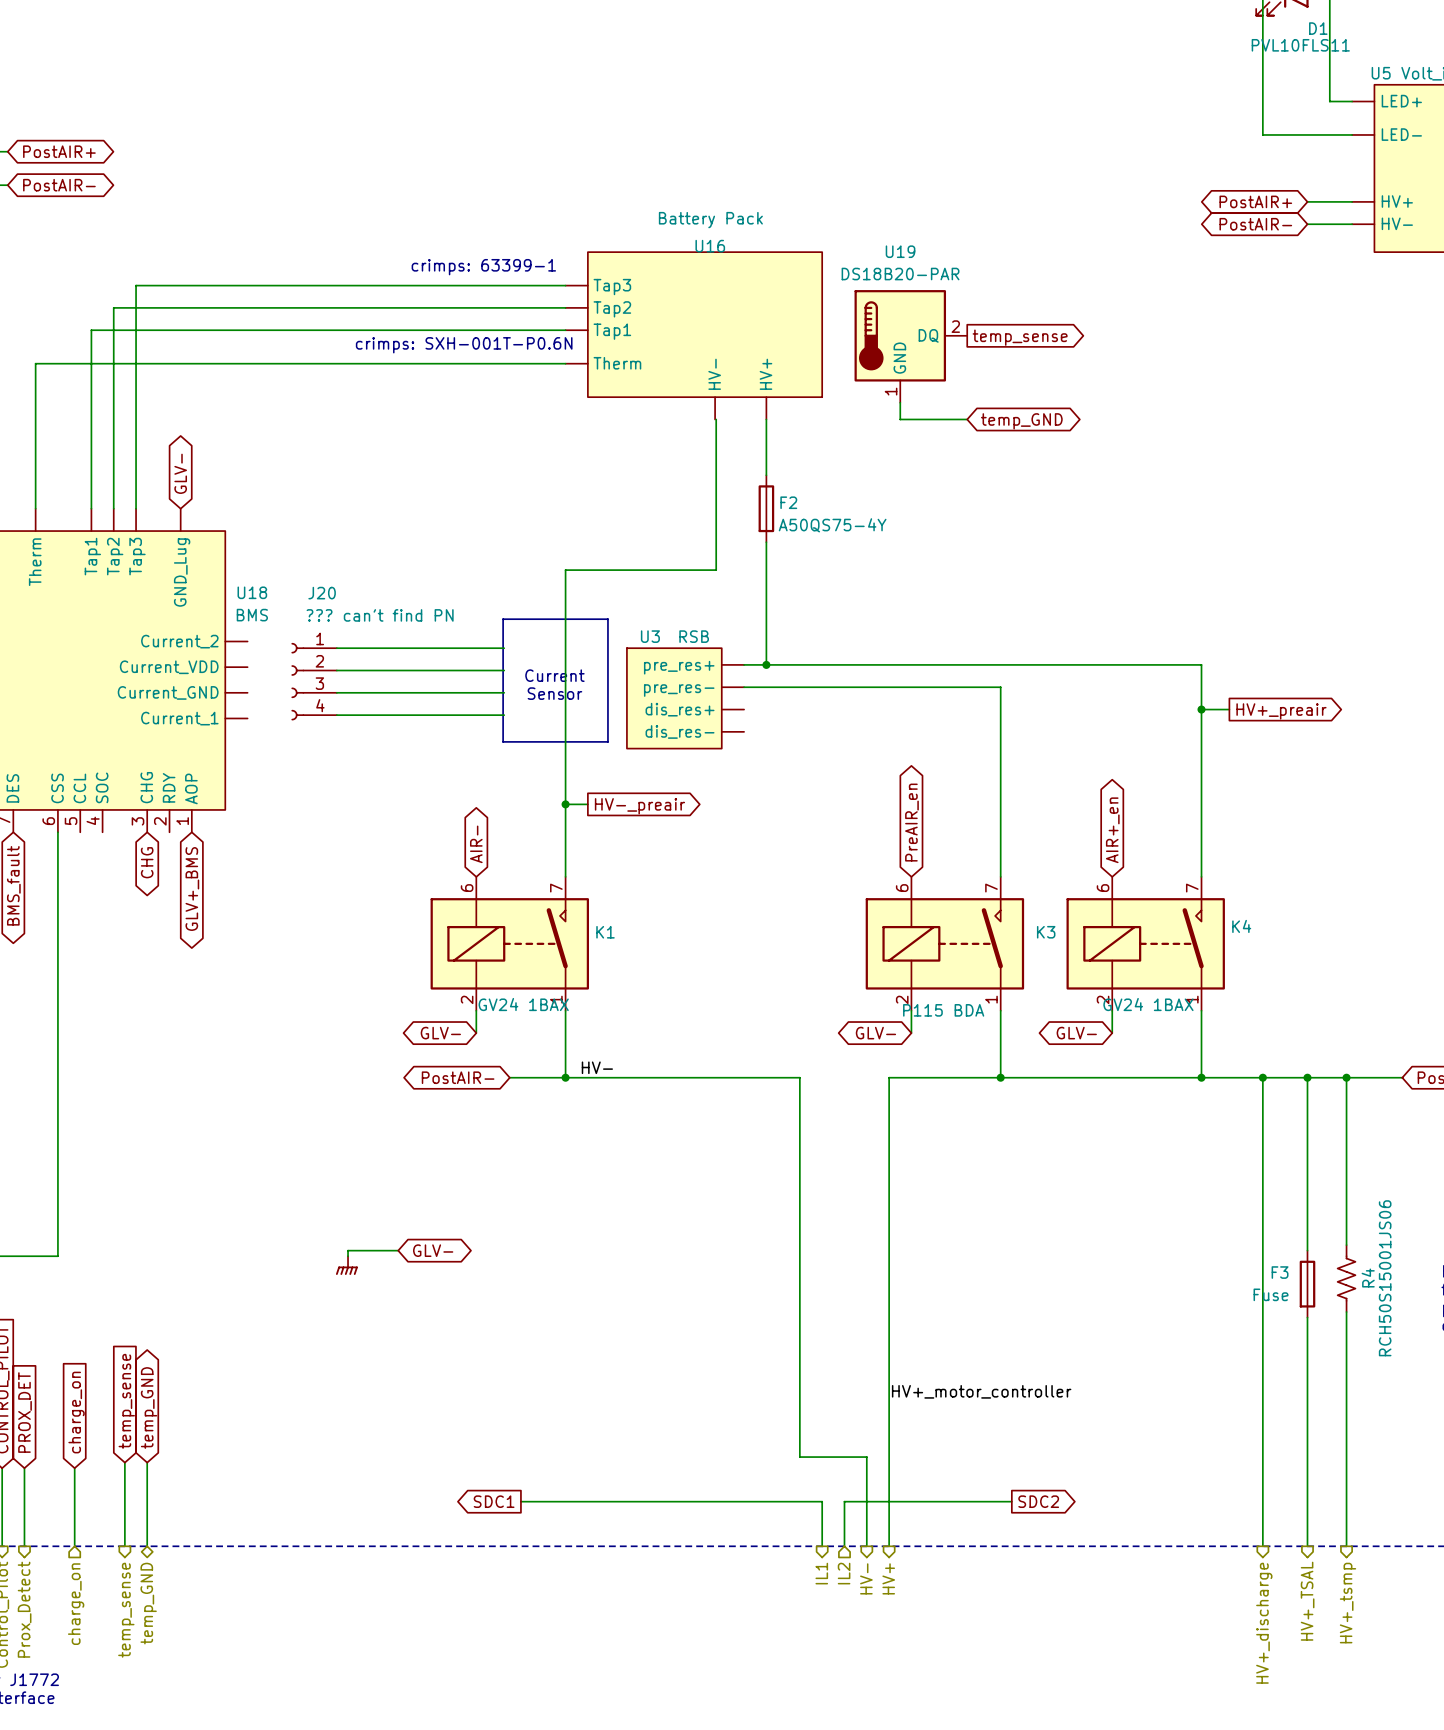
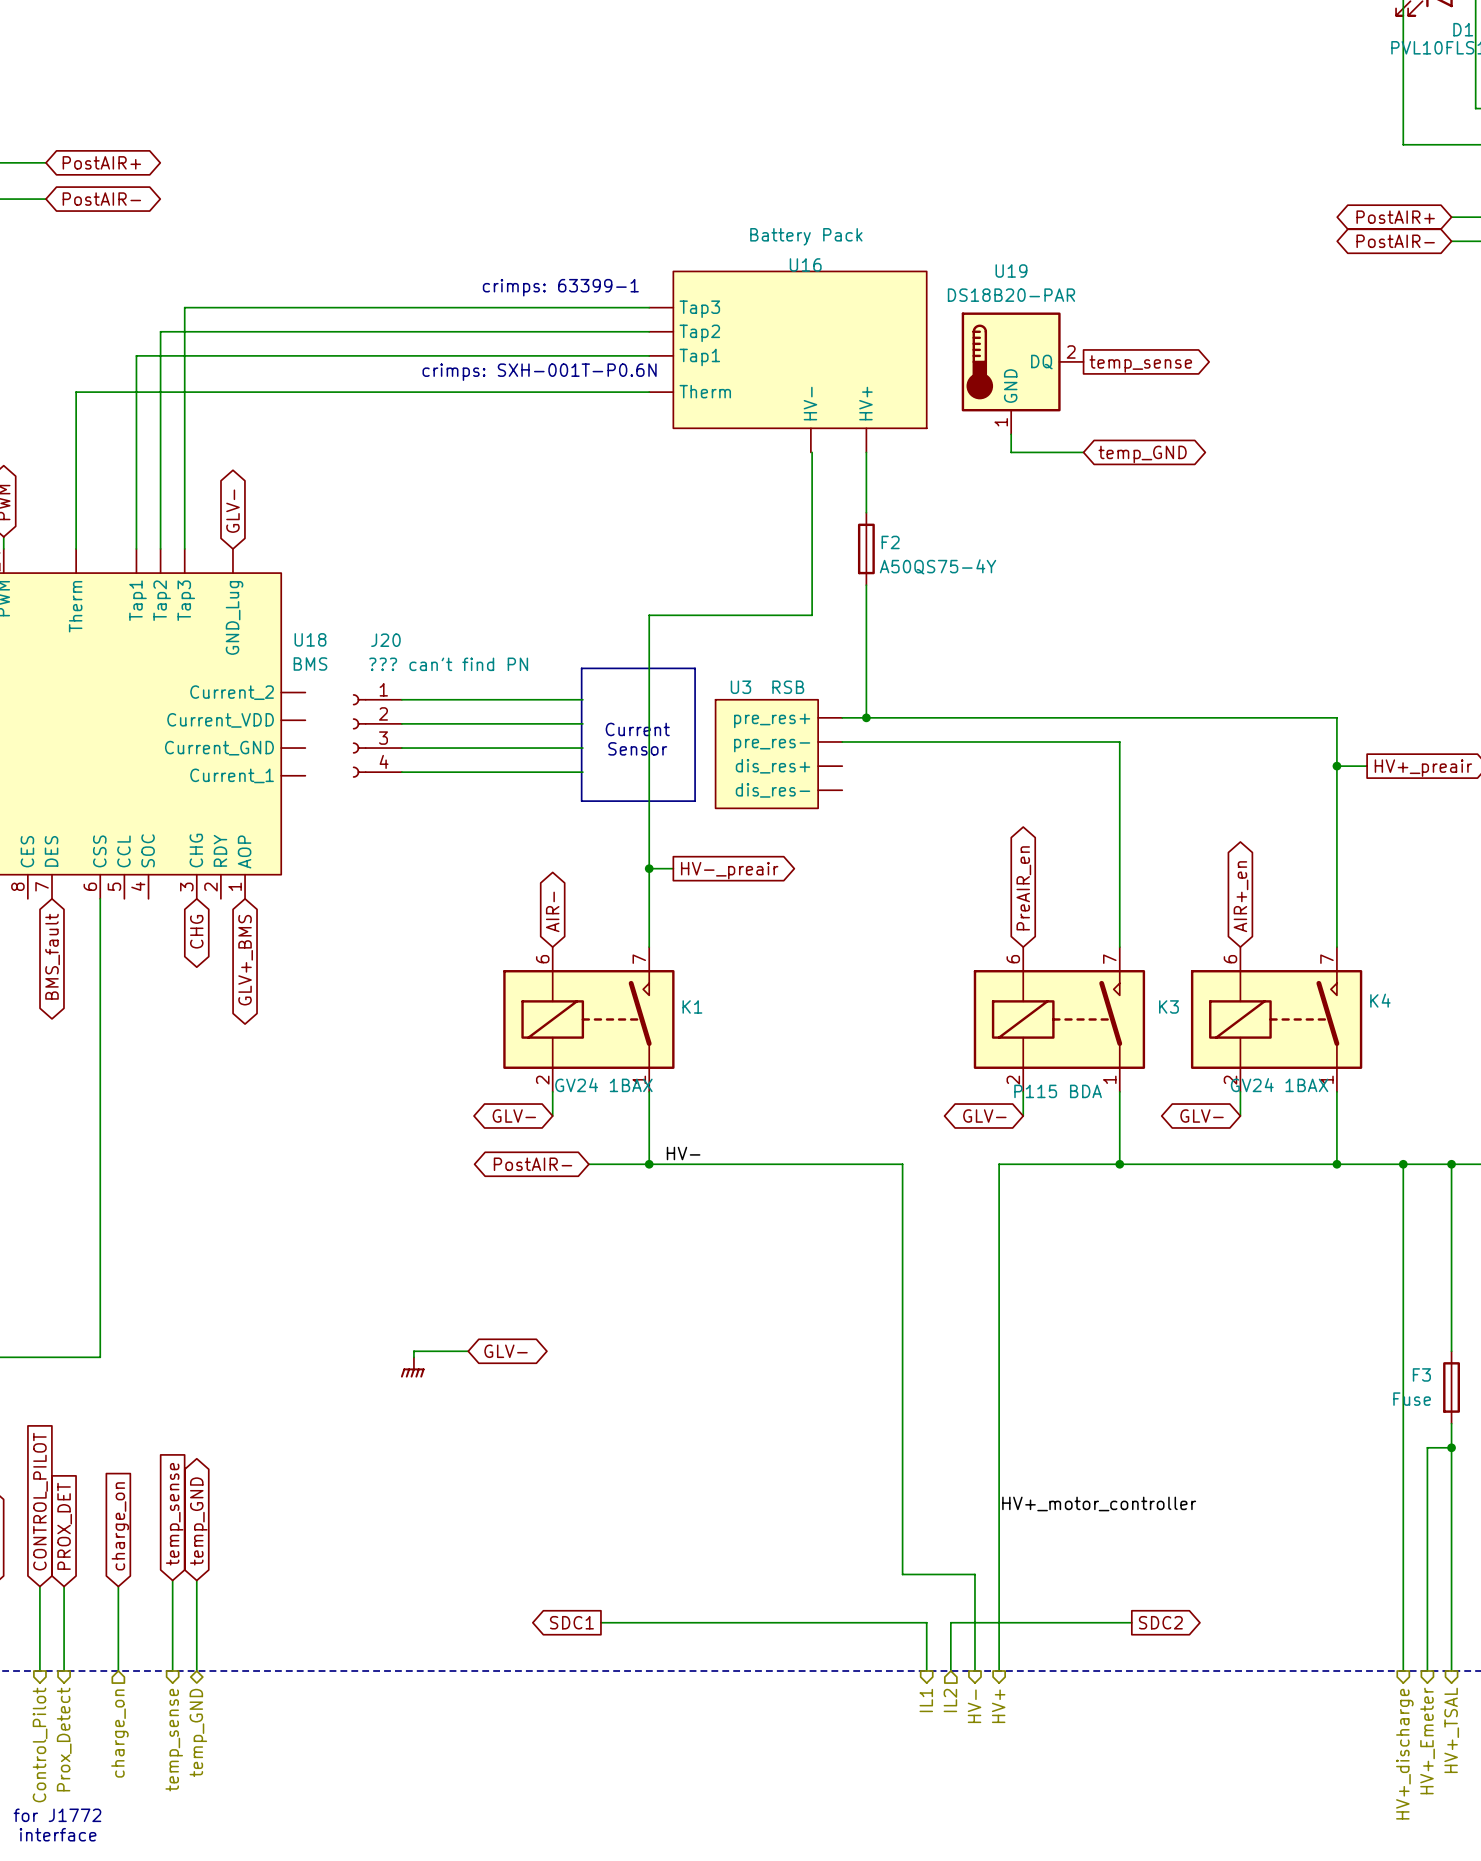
wire: none -> (1451, 1447) (1427, 1447) (1427, 1671)
junction: none -> (1451, 1447)
hierarchical label: none -> HV+_Emeter (1427, 1740)

